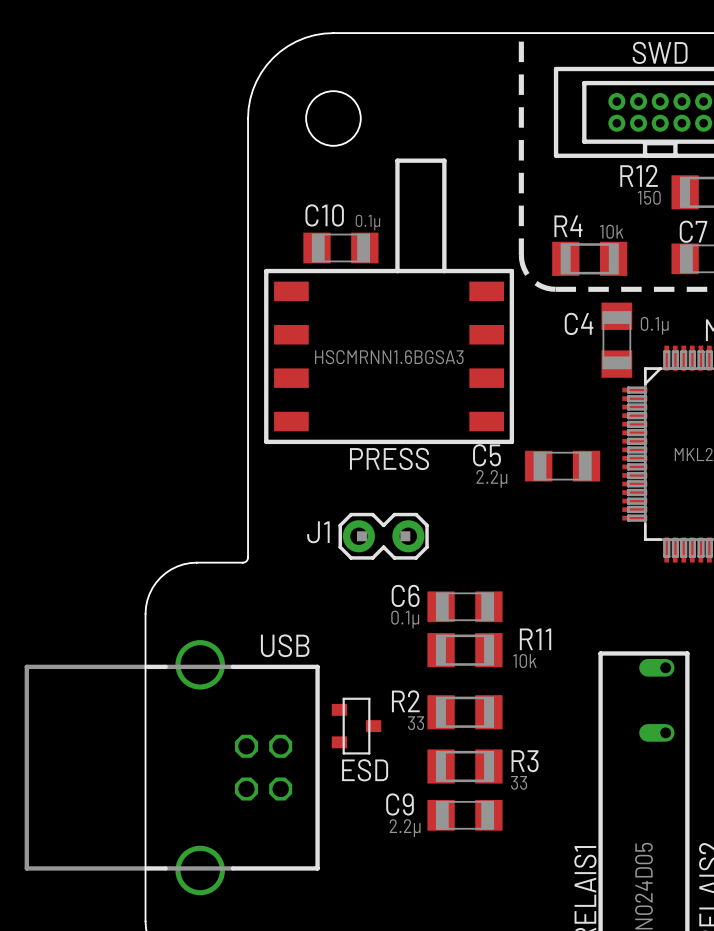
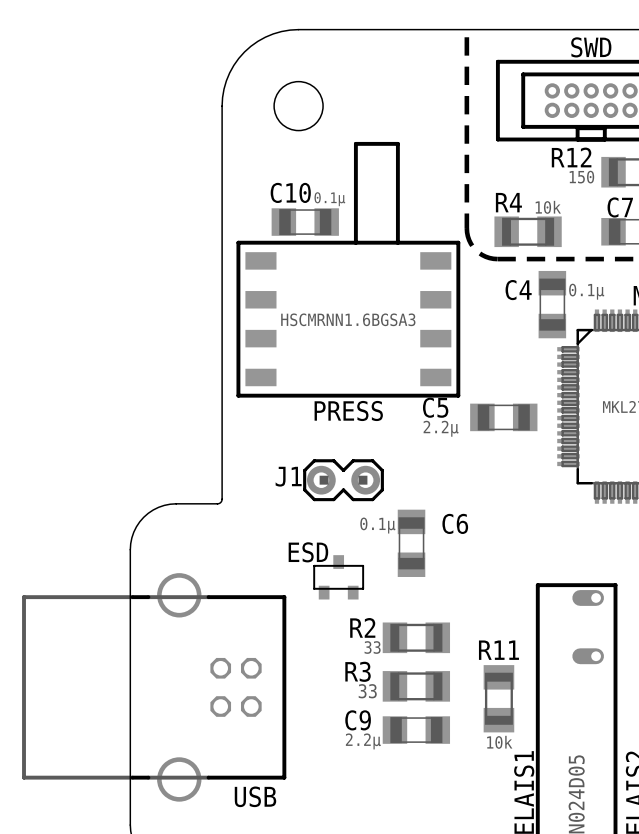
C6 name position: C6 (405, 595) -> C6 (455, 523)
C6 rotation: 0° (464, 606) -> 90° clockwise (411, 543)
C6 value position: 0.1µ (405, 619) -> 0.1µ (377, 525)
R11 name position: R11 (535, 639) -> R11 (498, 650)
text position: USB (285, 645) -> USB (255, 796)
R11 rotation: 0° (464, 650) -> 90° clockwise (498, 698)
R11 position: (464, 650) -> (498, 698)
ESD rotation: 0° (356, 726) -> 90° counterclockwise (338, 577)
ESD position: (356, 726) -> (338, 577)
R3 name position: R3 (525, 761) -> R3 (358, 671)
ESD name position: ESD (365, 770) -> ESD (308, 552)
R3 value position: 33 (519, 782) -> 33 (367, 691)

